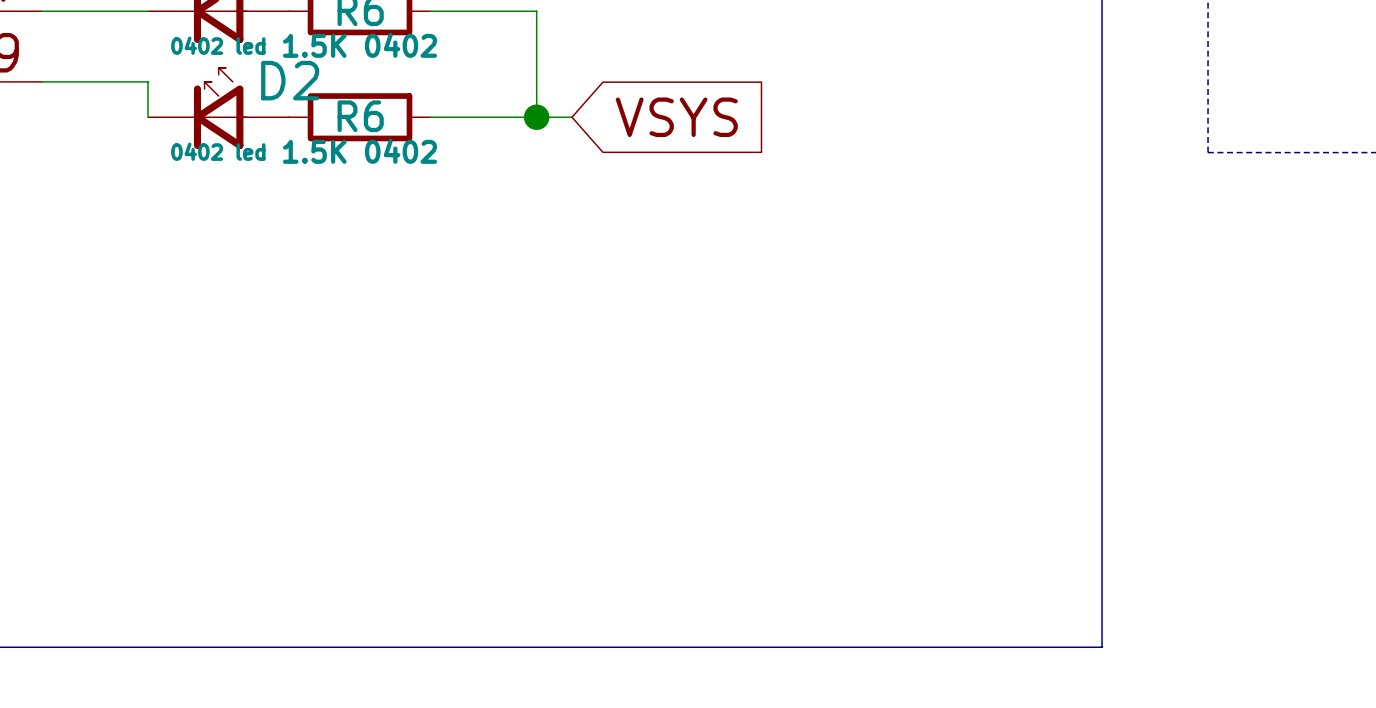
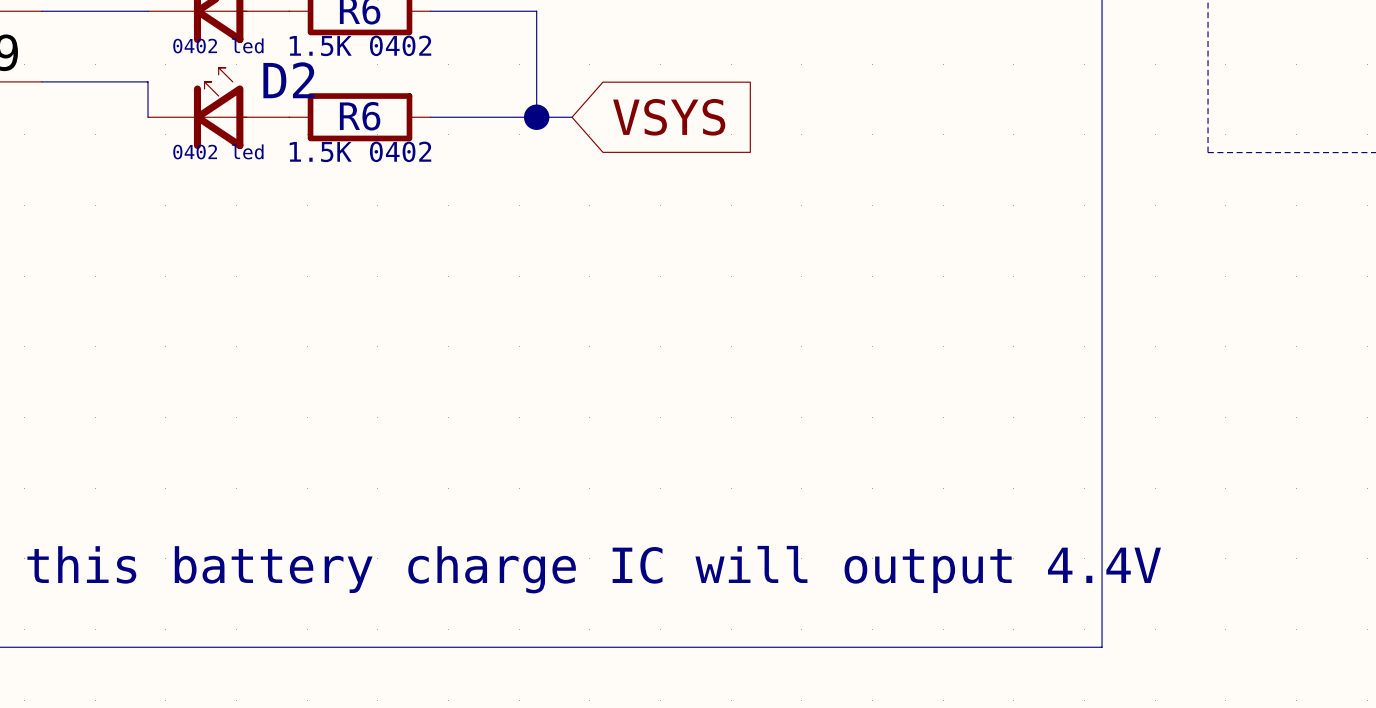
text: none -> this battery charge IC will output 4.4V (594, 569)

